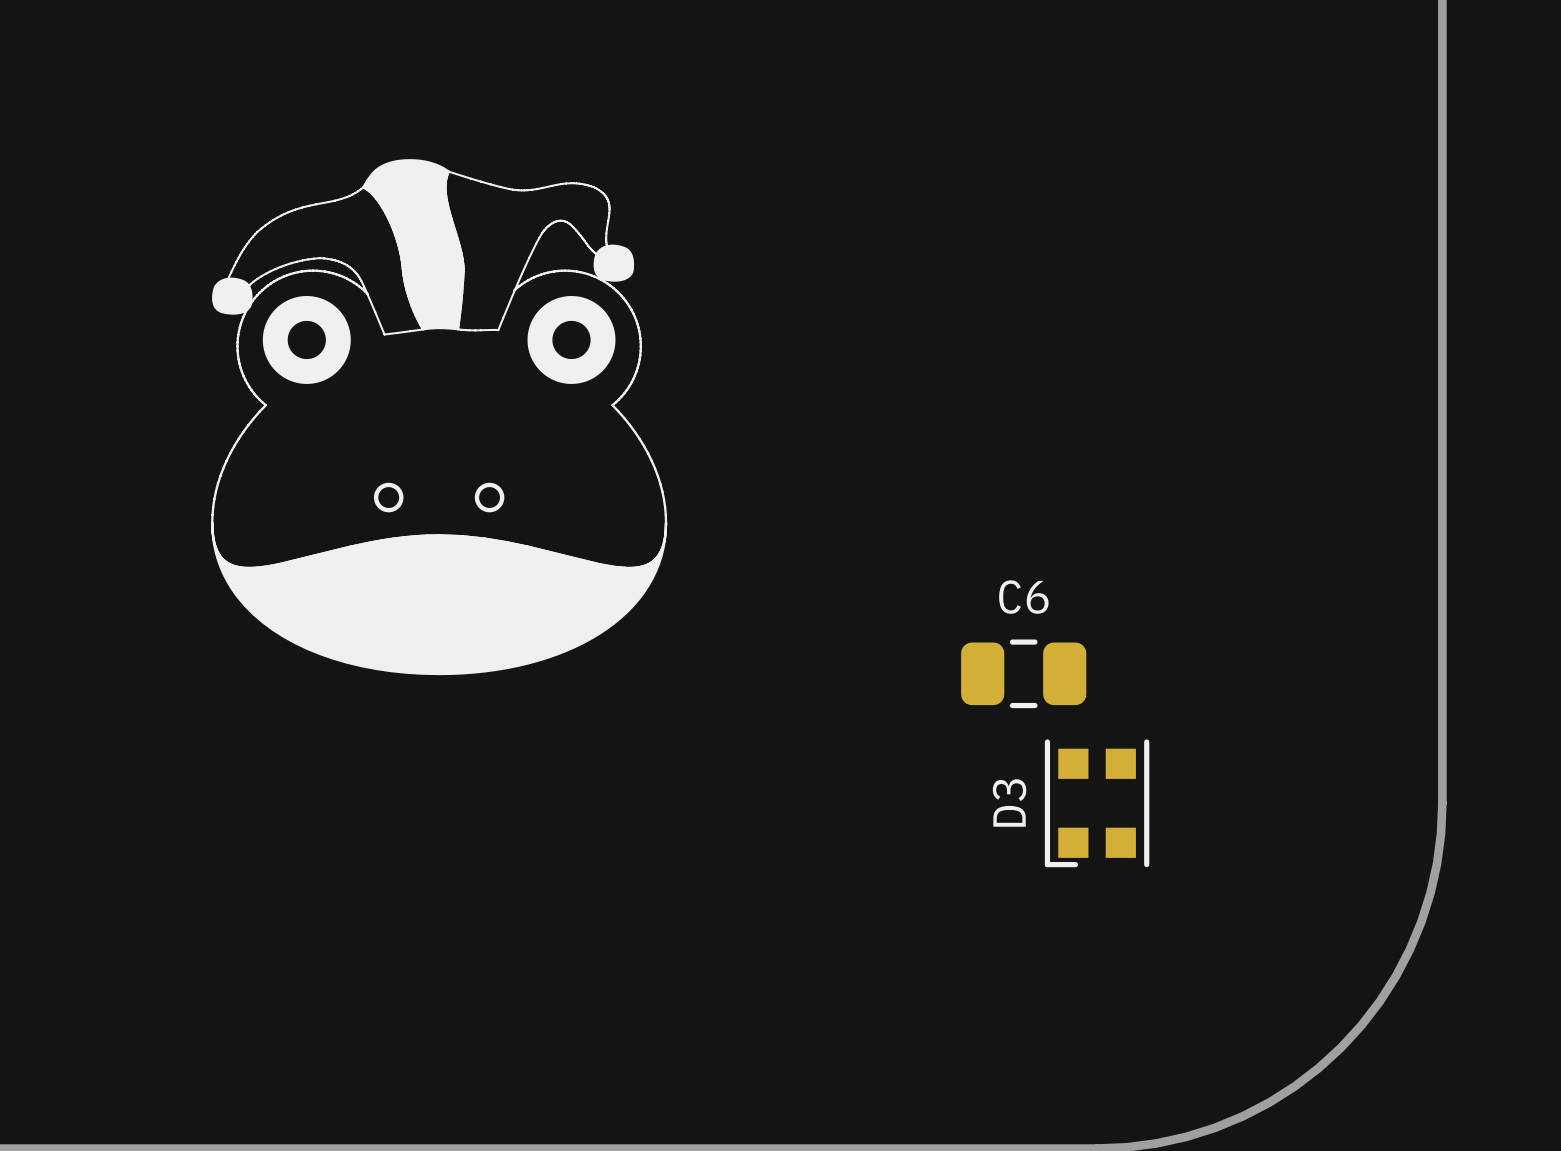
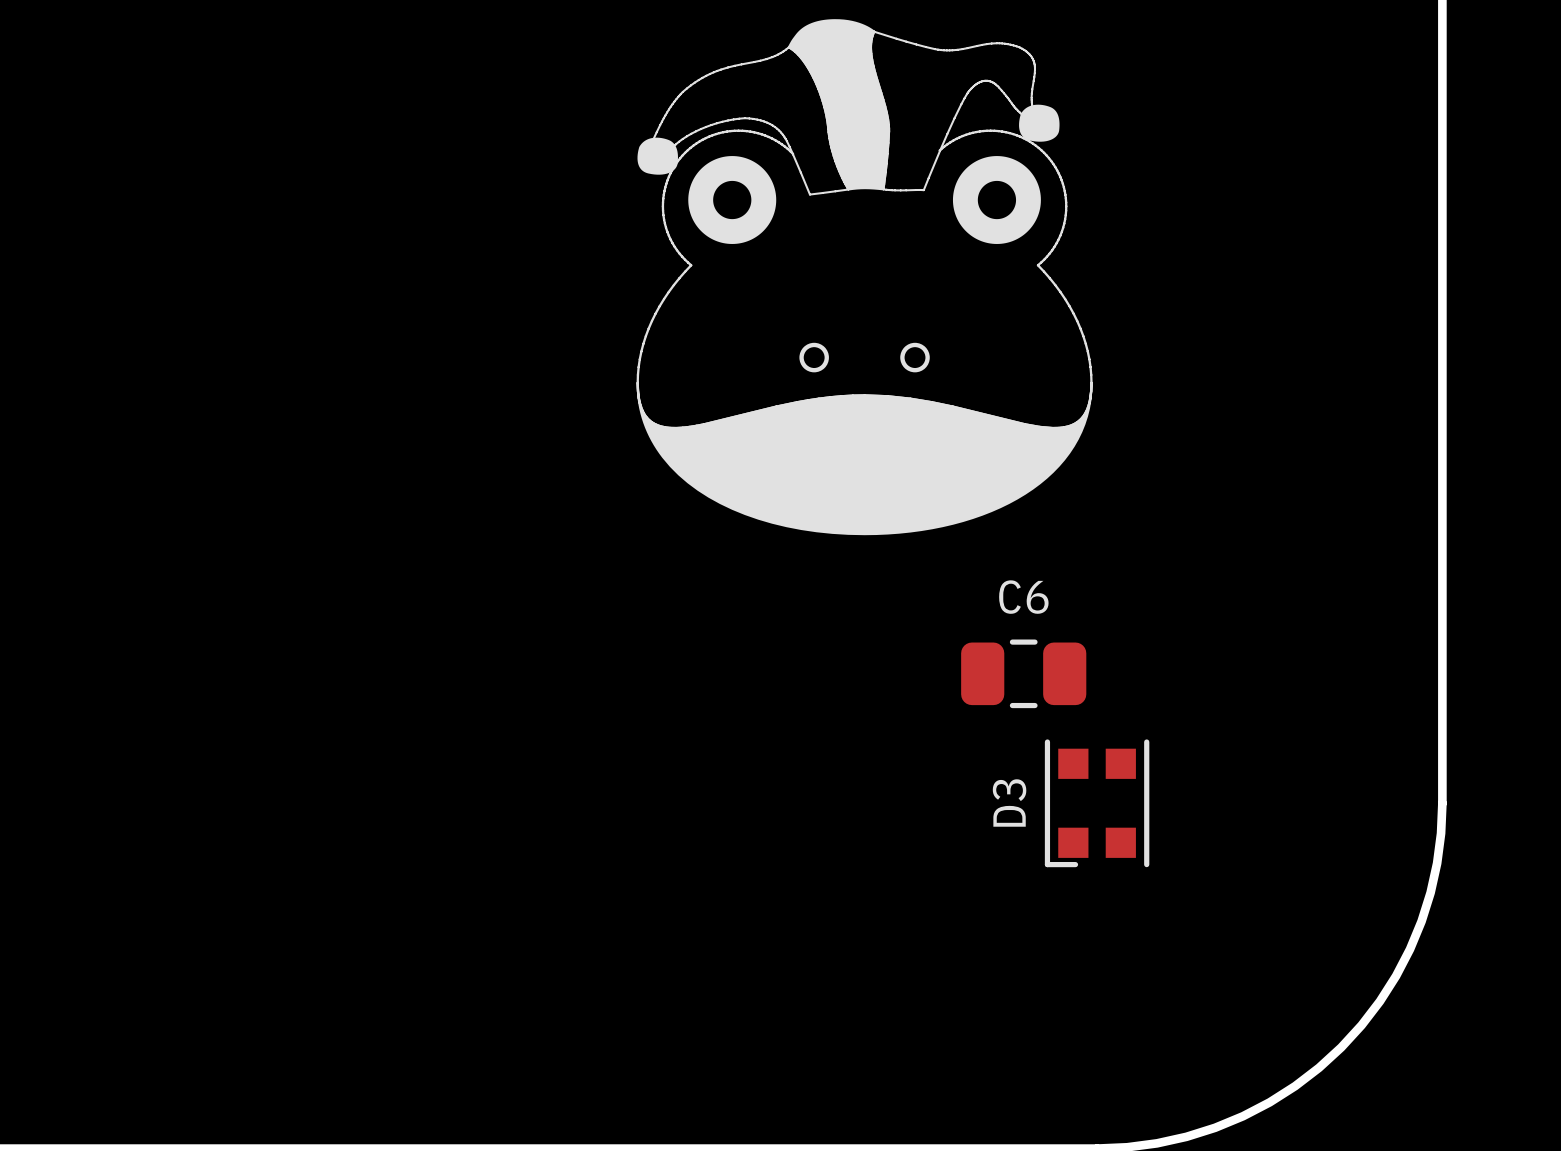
drawing: none -> [952, 104, 1060, 244]
line: (448, 171) (515, 190) (532, 189) (571, 183) (594, 187) (604, 194) (609, 204) (607, 246) (596, 254) (569, 223) (561, 220) (552, 222) (543, 231) (535, 244) (498, 330) (458, 329) (463, 268) (461, 252) (446, 199) (445, 184) (448, 171) -> (874, 31) (941, 50) (957, 49) (996, 43) (1019, 47) (1029, 54) (1034, 64) (1032, 106) (1021, 114) (994, 83) (987, 80) (978, 83) (968, 91) (961, 104) (923, 190) (883, 189) (889, 128) (886, 112) (872, 59) (871, 44) (874, 31)
line: (363, 187) (376, 198) (390, 223) (398, 247) (408, 296) (423, 329) (384, 334) (358, 276) (349, 267) (335, 260) (313, 258) (285, 264) (261, 276) (244, 290) (227, 280) (247, 244) (257, 231) (269, 222) (295, 209) (346, 197) (363, 187) -> (788, 47) (801, 58) (816, 83) (824, 107) (833, 156) (848, 189) (809, 194) (784, 136) (775, 127) (760, 120) (739, 118) (711, 125) (686, 136) (670, 150) (653, 140) (672, 104) (682, 91) (694, 82) (720, 69) (772, 57) (788, 47)
drawing position: (413, 244) -> (838, 104)
drawing position: (613, 263) -> (657, 156)
drawing: [212, 277, 351, 384] -> none
line: (514, 290) (527, 280) (543, 273) (561, 270) (580, 272) (594, 276) (610, 285) (623, 298) (633, 313) (640, 338) (638, 363) (629, 386) (612, 405) (629, 425) (644, 446) (655, 468) (662, 491) (665, 514) (664, 538) (658, 554) (648, 564) (633, 567) (614, 566) (506, 542) (439, 535) (404, 537) (371, 542) (257, 567) (234, 566) (222, 558) (214, 544) (212, 531) (213, 507) (217, 483) (234, 446) (248, 425) (265, 405) (247, 383) (238, 359) (238, 334) (246, 310) (257, 295) (270, 283) (287, 275) (301, 271) (321, 271) (336, 274) (353, 282) (367, 294) -> (939, 150) (953, 140) (969, 133) (986, 130) (1005, 132) (1020, 136) (1035, 145) (1048, 158) (1058, 173) (1065, 198) (1064, 223) (1054, 246) (1037, 265) (1055, 285) (1069, 306) (1080, 328) (1087, 351) (1091, 374) (1090, 398) (1084, 414) (1073, 424) (1058, 427) (1039, 426) (932, 402) (864, 395) (830, 397) (797, 402) (682, 427) (660, 426) (647, 418) (640, 404) (638, 391) (638, 367) (643, 343) (659, 306) (673, 285) (691, 265) (672, 243) (664, 219) (663, 194) (672, 170) (682, 155) (696, 143) (712, 135) (727, 131) (746, 131) (761, 134) (778, 142) (793, 154)
drawing position: (571, 339) -> (732, 200)
drawing: none -> [799, 342, 829, 373]
drawing: none -> [900, 342, 930, 373]
drawing: [373, 482, 404, 513] -> none
drawing: [474, 482, 505, 513] -> none
drawing position: (439, 598) -> (864, 458)

